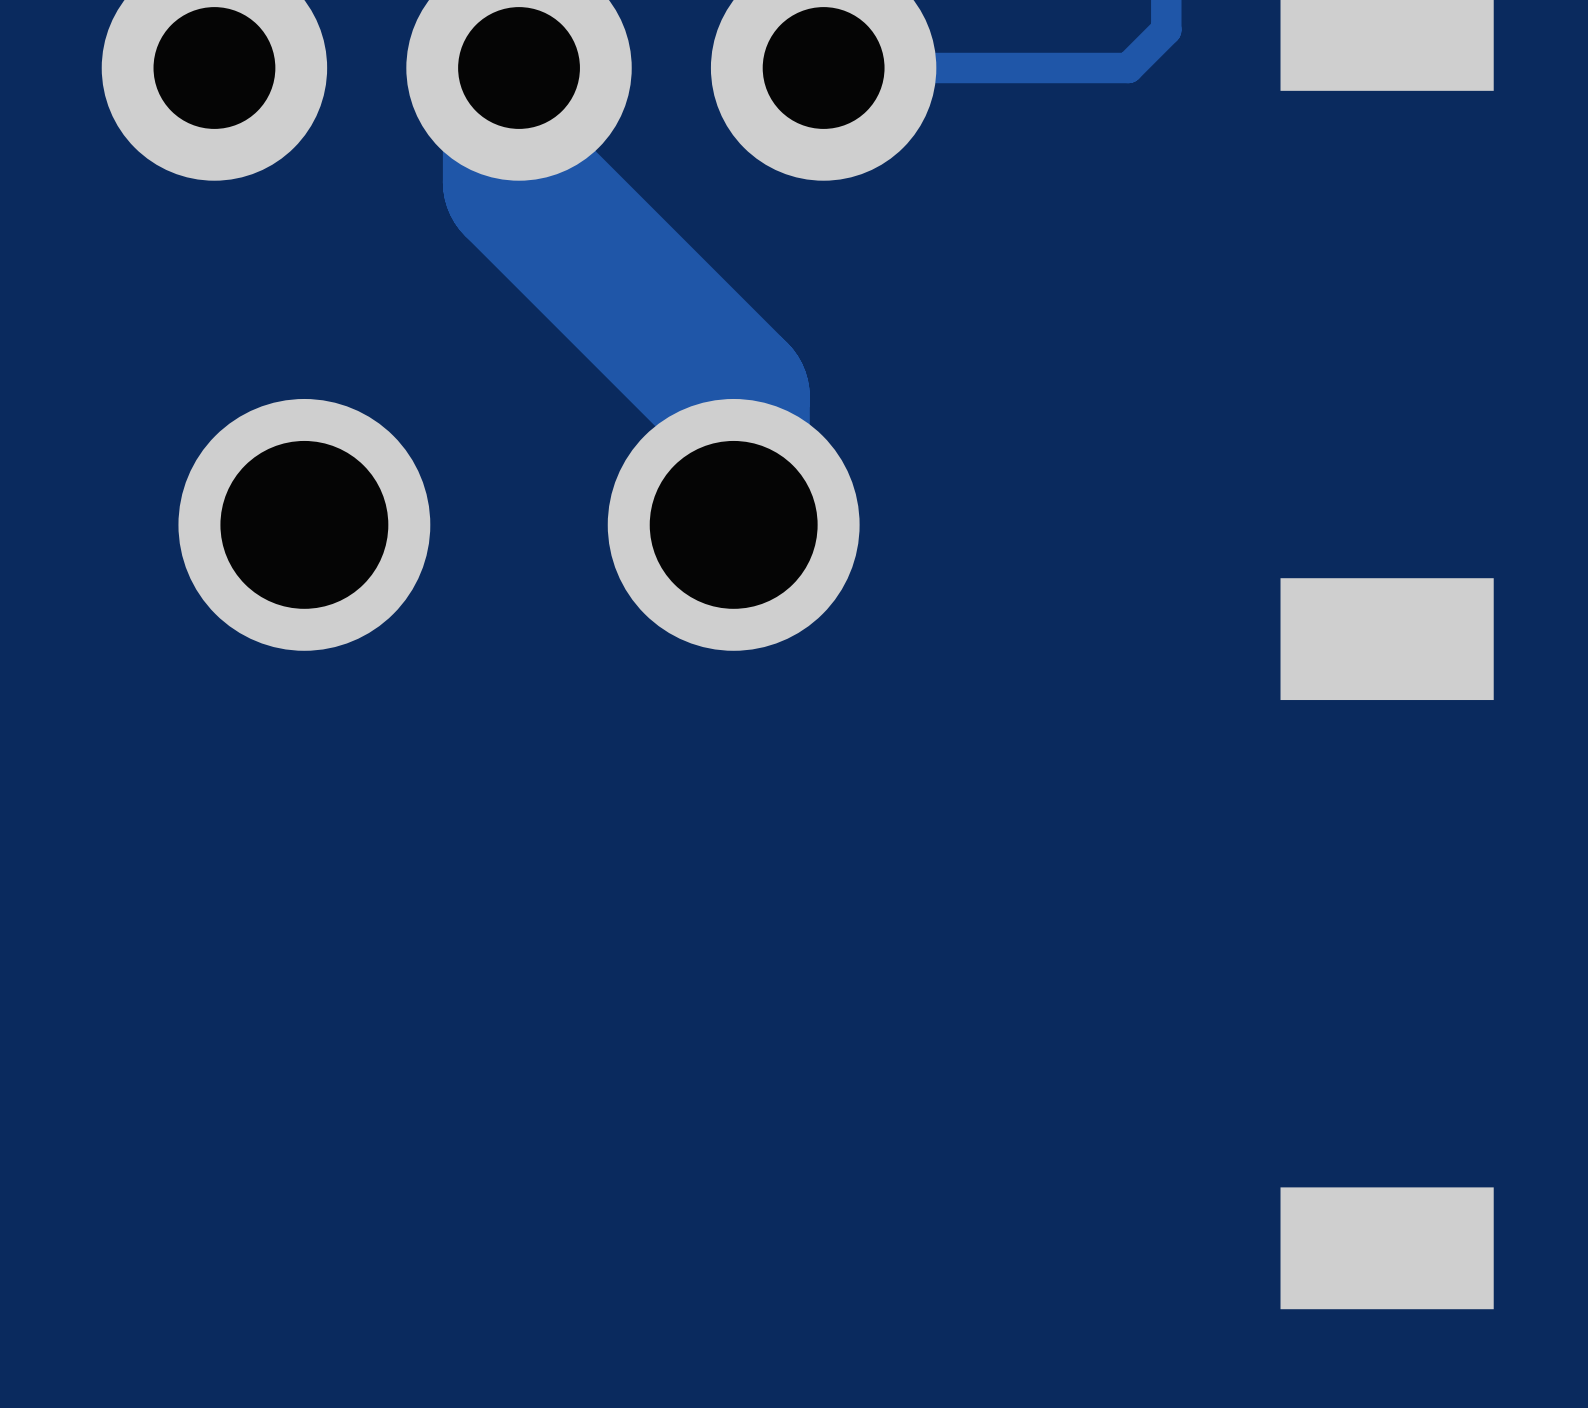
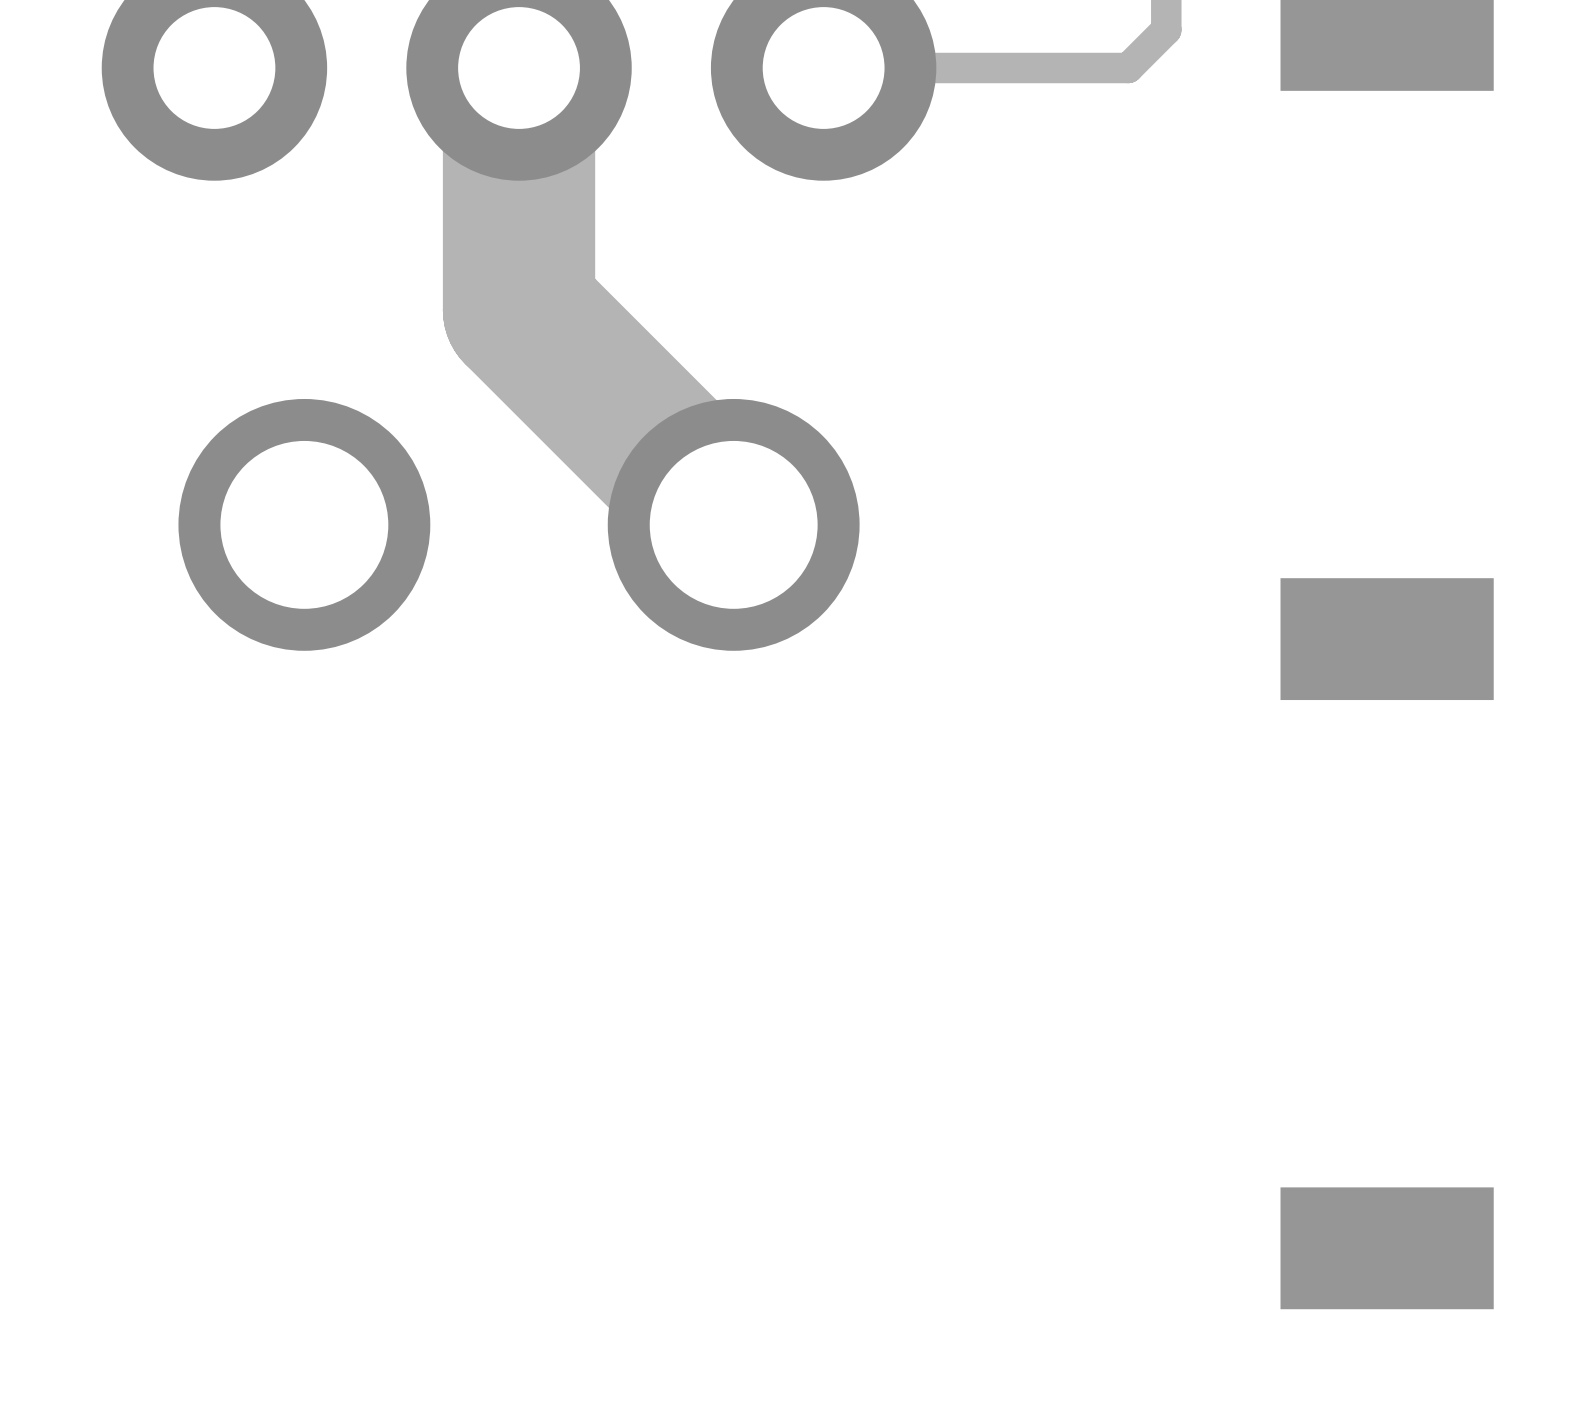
track: (519, 182) (733, 396) (733, 524) -> (519, 182) (519, 310) (733, 524)

